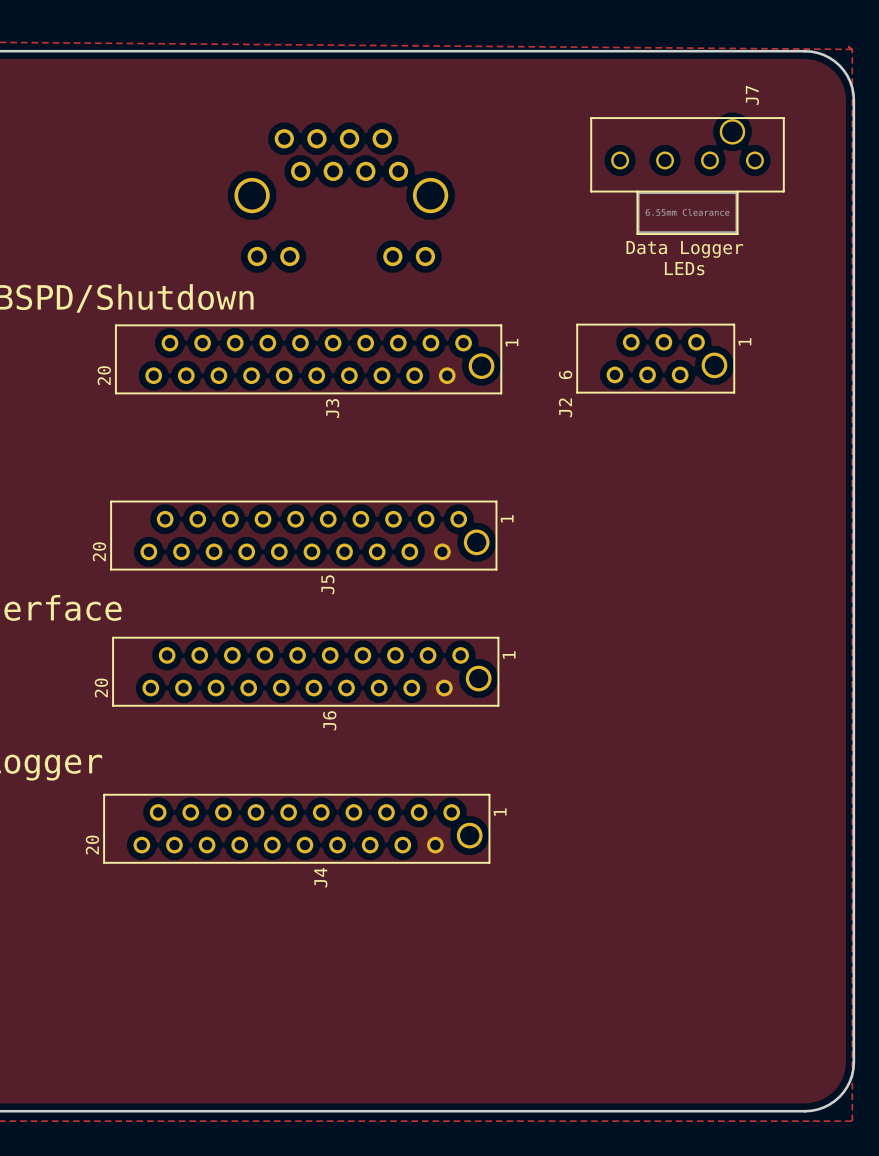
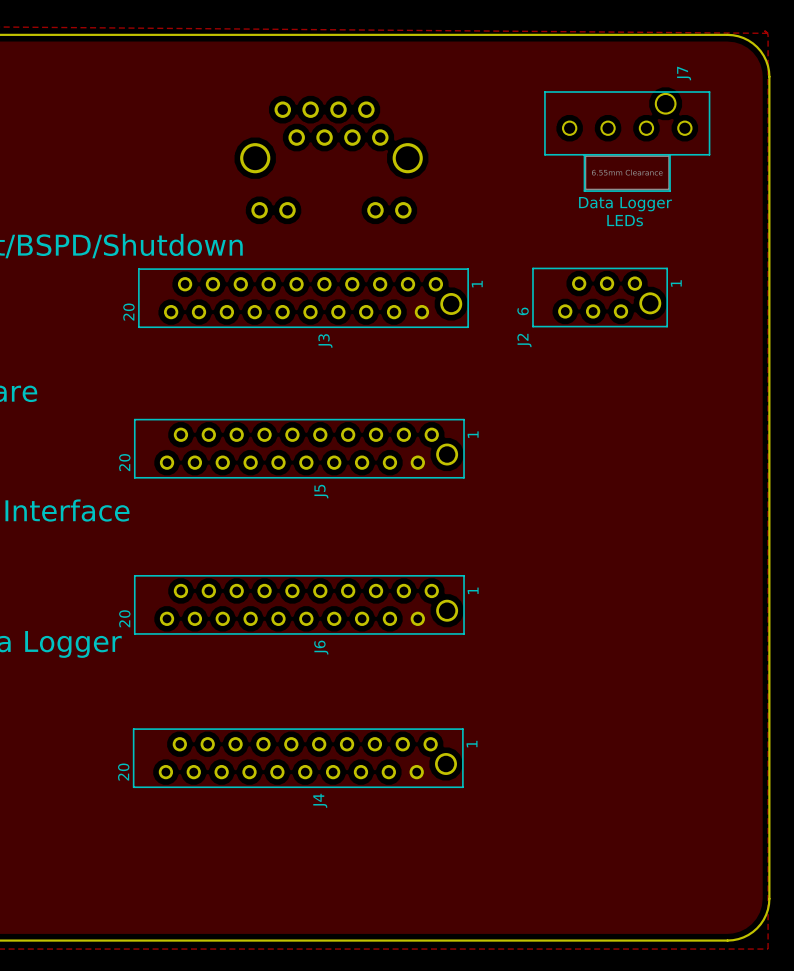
J6 position: (305, 671) -> (299, 604)
J4 position: (296, 828) -> (298, 758)

